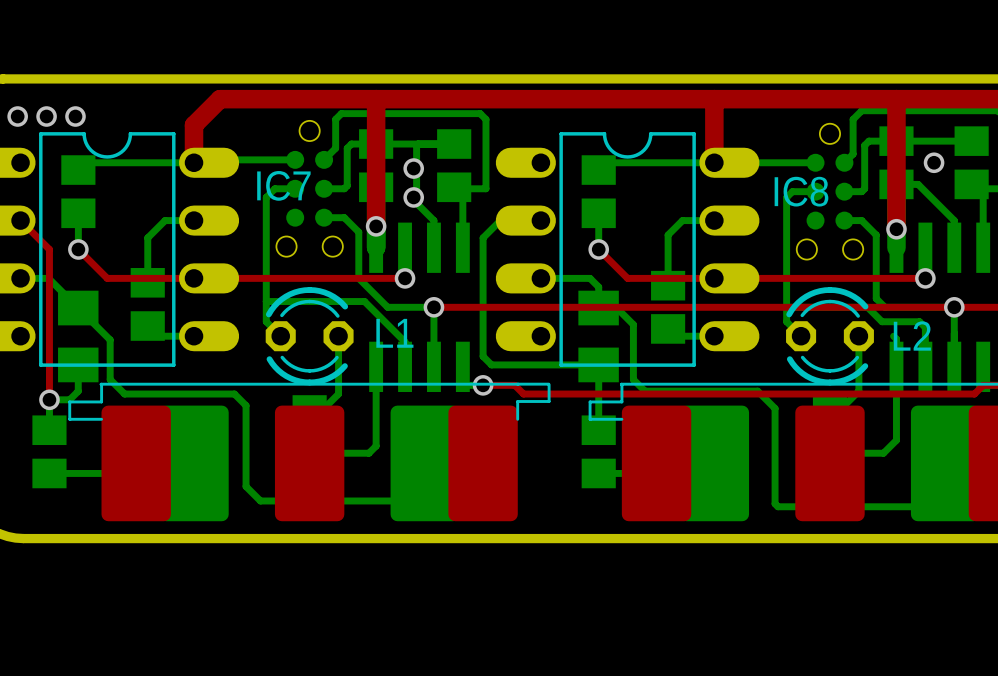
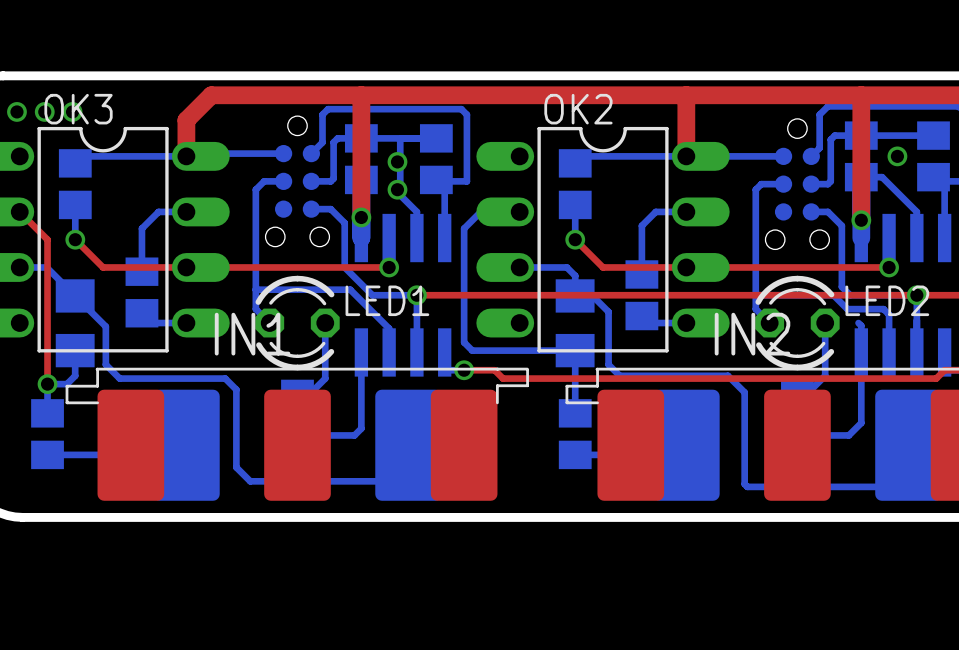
IC7 name: IC7 (283, 185) -> OK3 (78, 109)
IC8 name: IC8 (801, 191) -> OK2 (578, 109)
L1 name: L1 (394, 333) -> LED1 (387, 300)
L2 name: L2 (912, 335) -> LED2 (887, 300)
IN1 name: none -> IN1 (252, 334)
IN2 name: none -> IN2 (752, 334)

